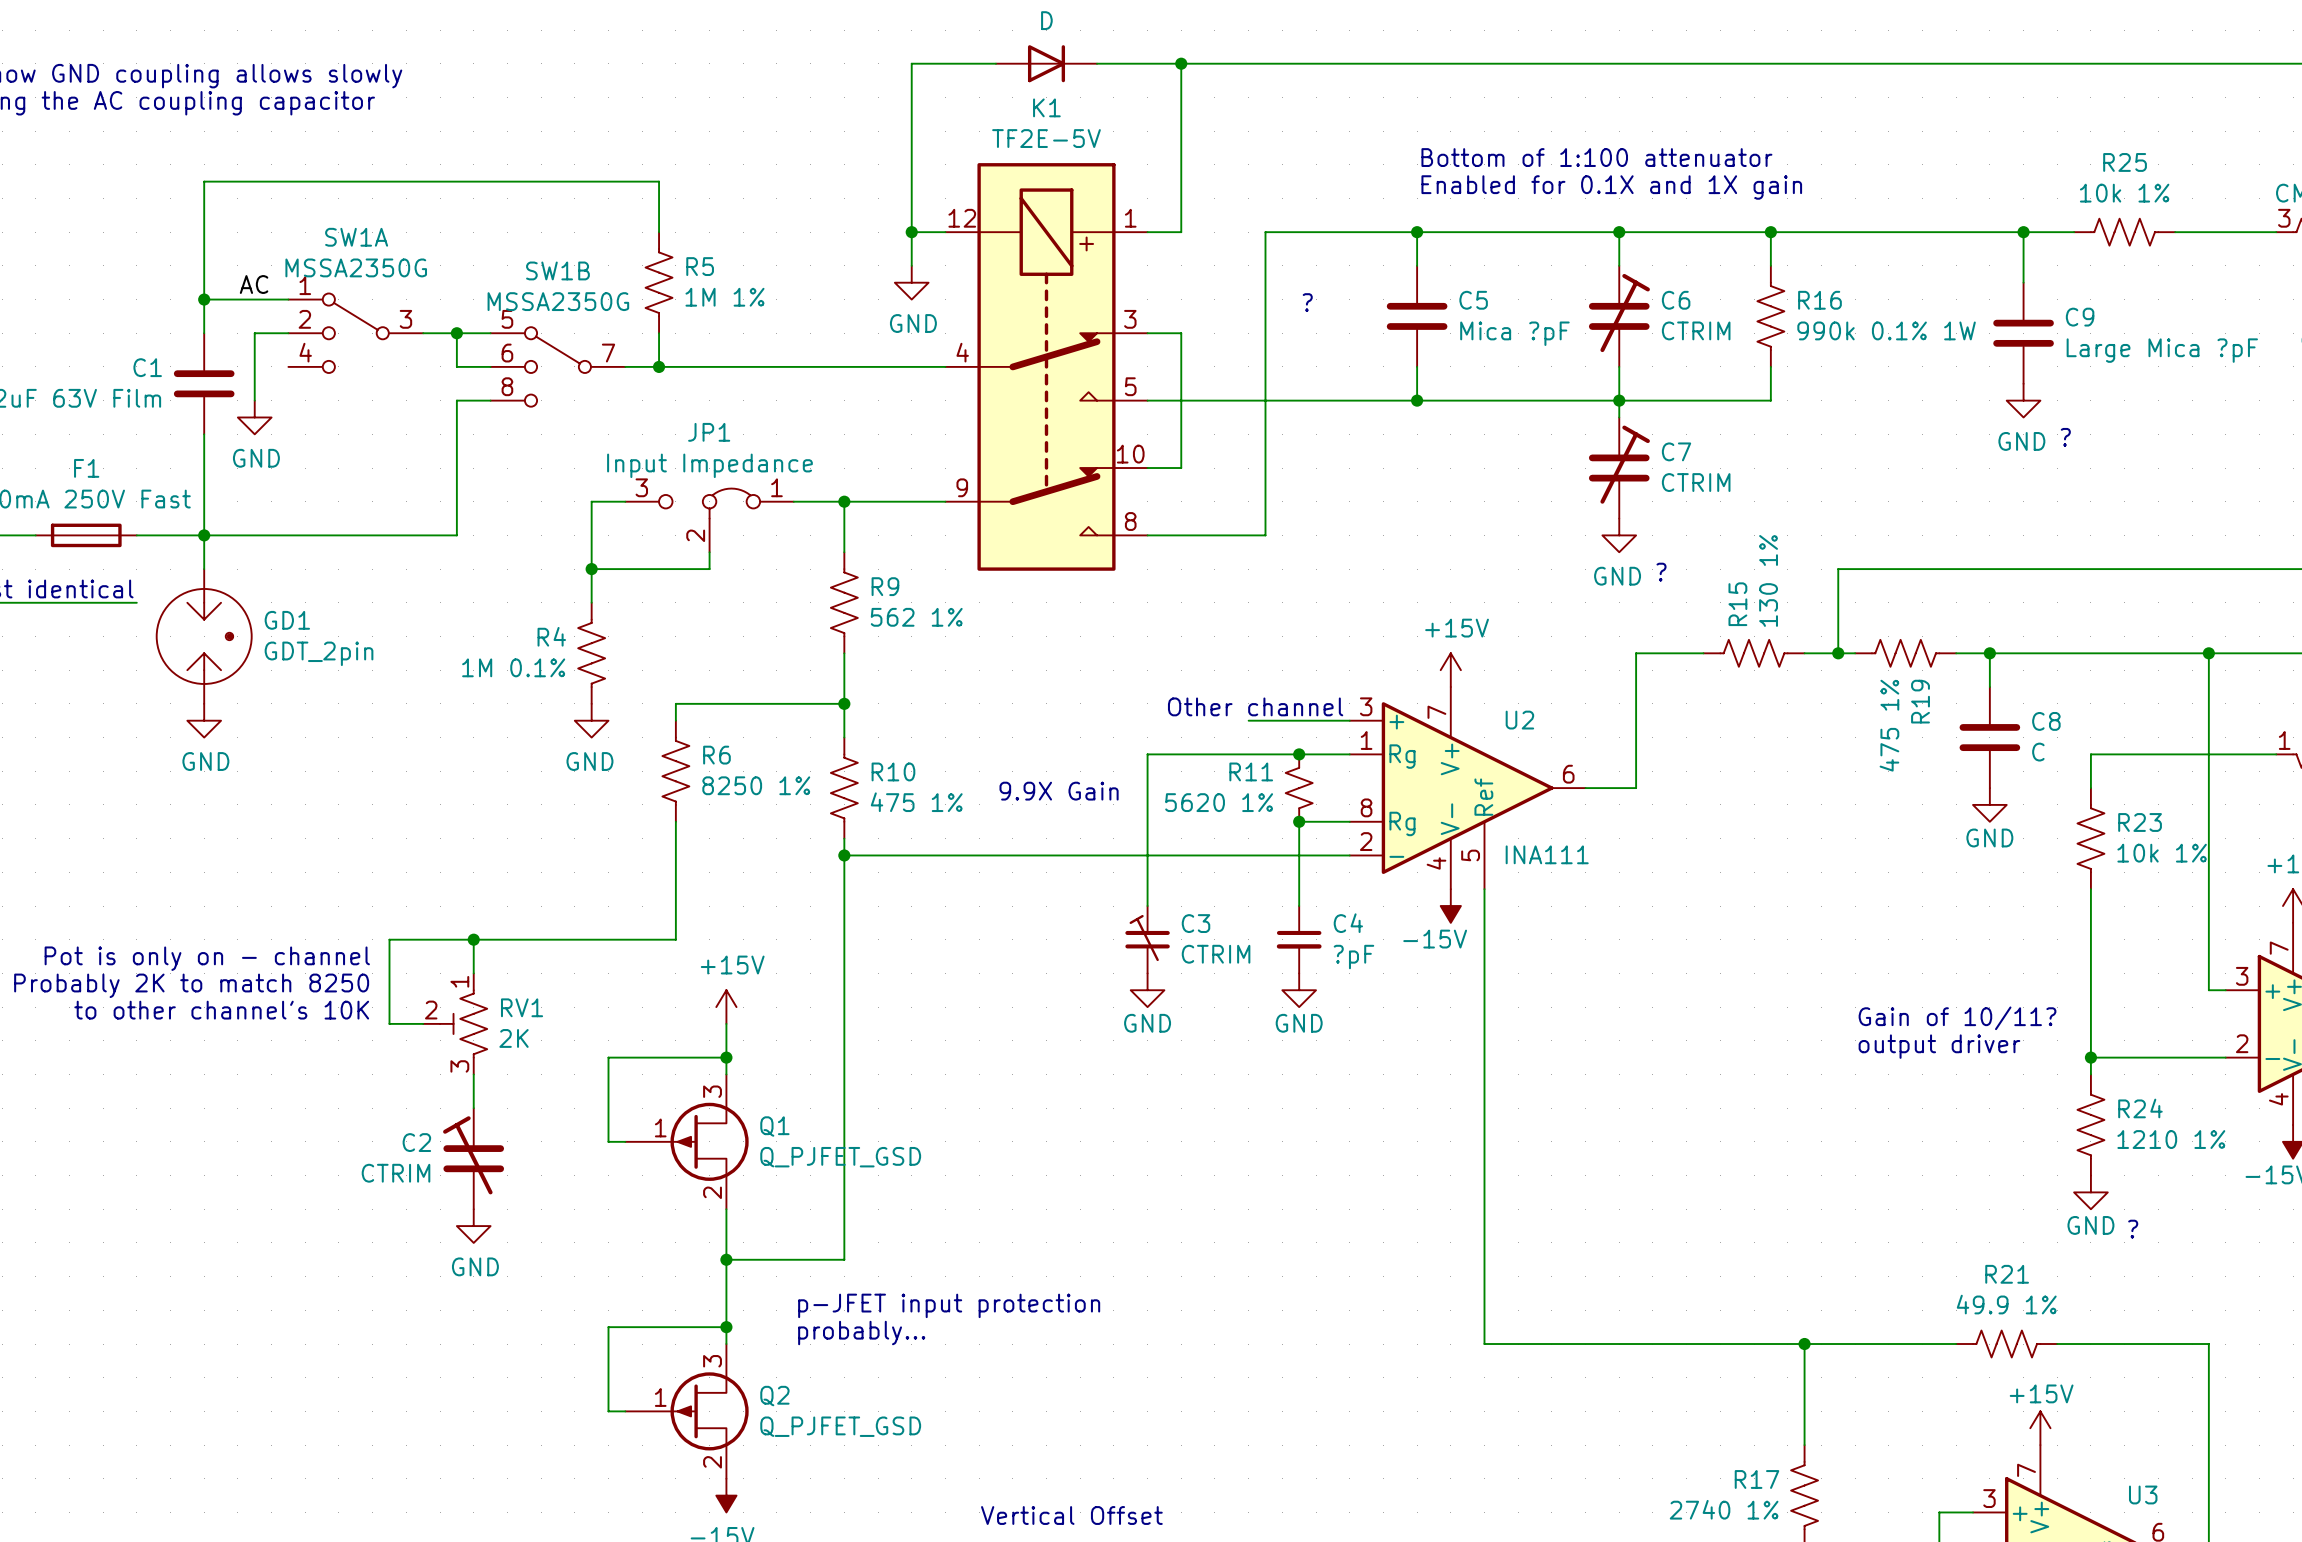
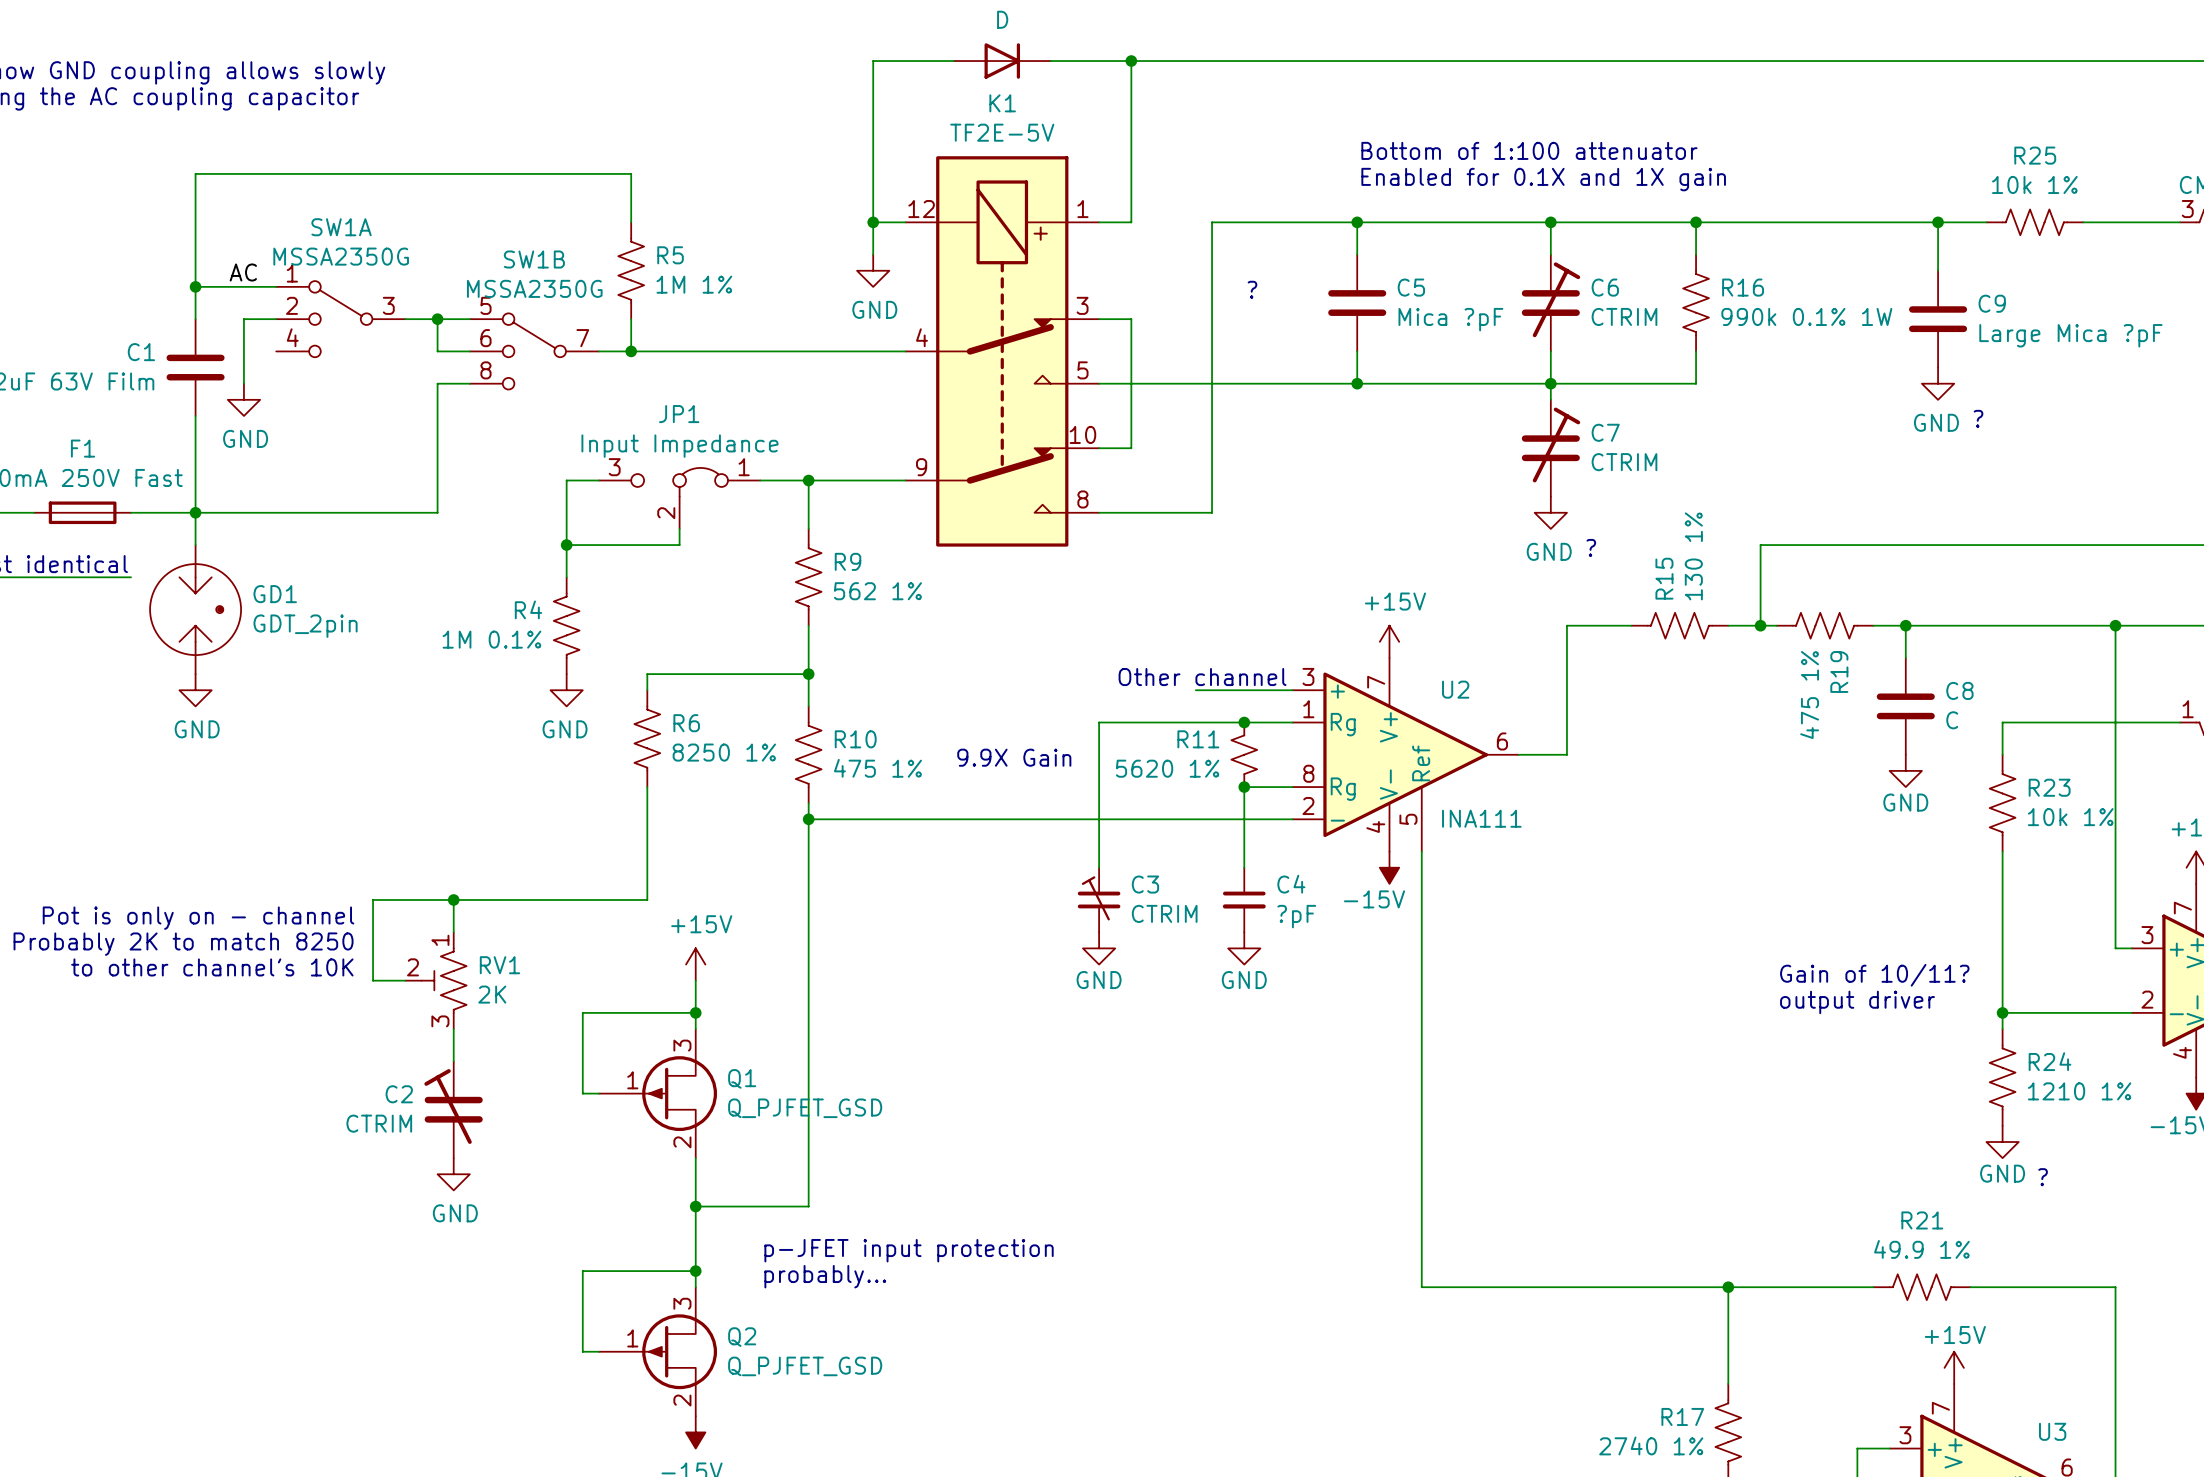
text: Vertical Offset (1071, 1515) -> none

